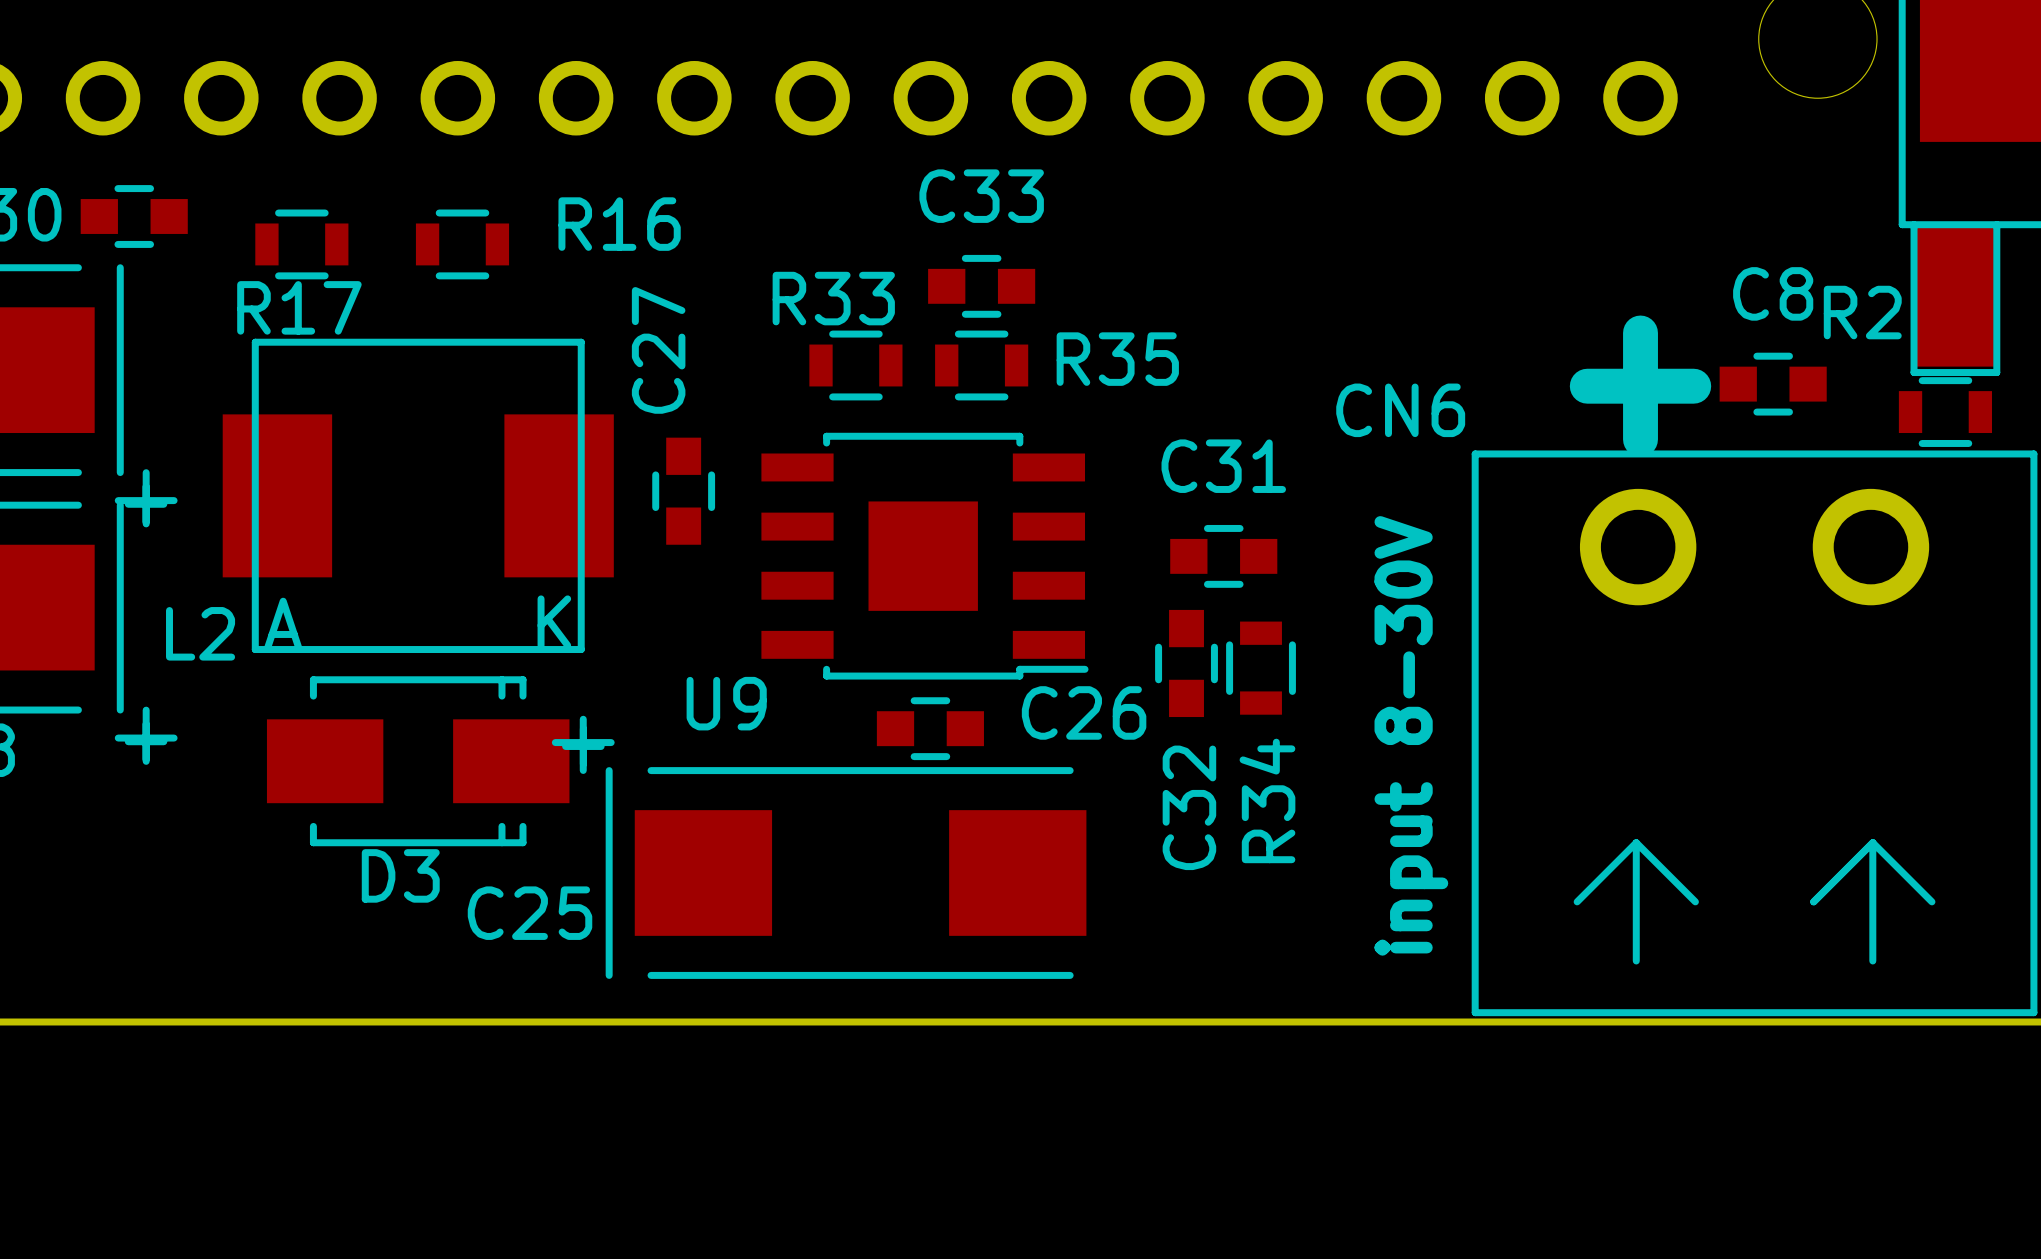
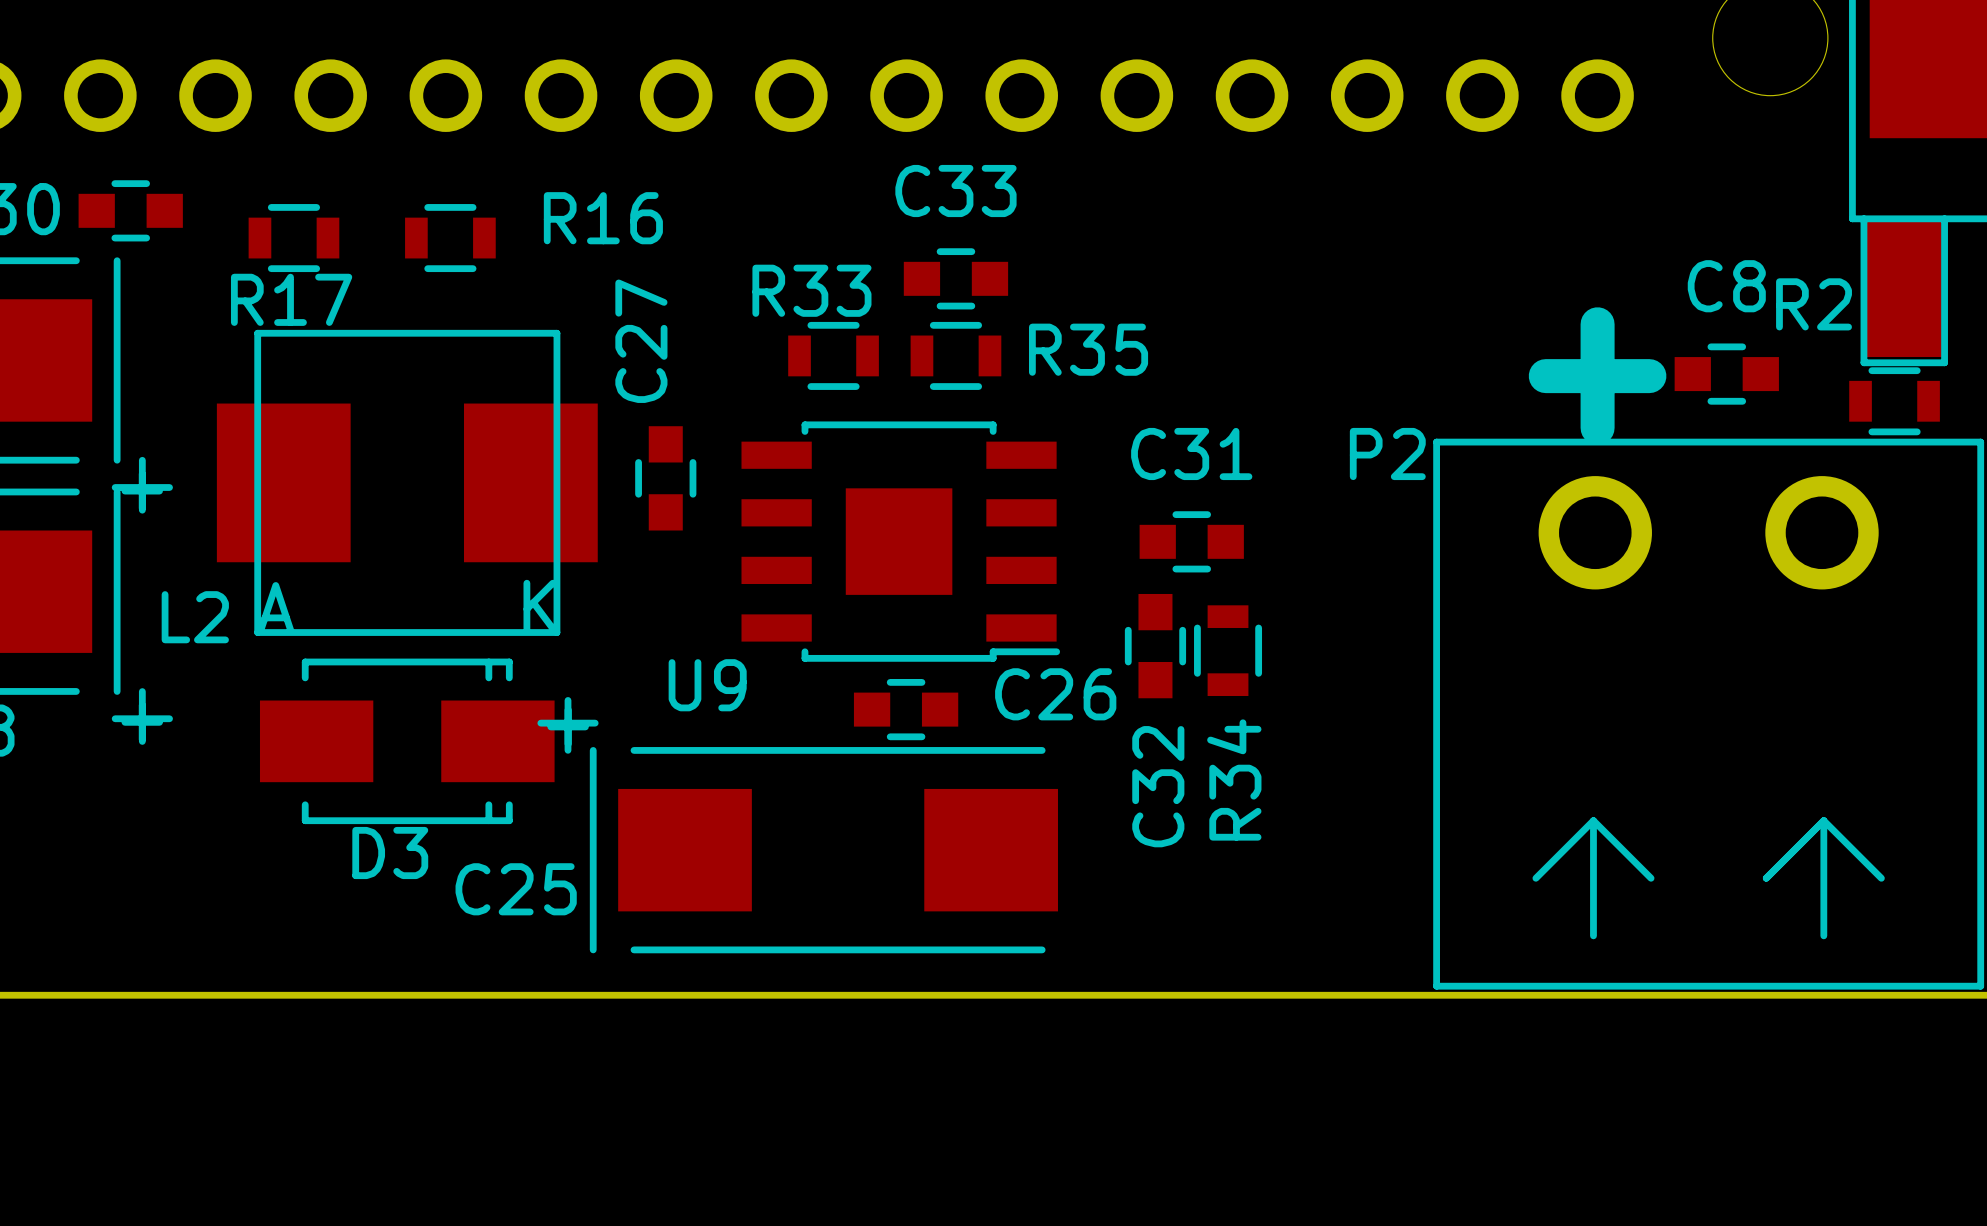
L2 footprint: [222, 338, 614, 654] -> [216, 329, 598, 636]
CN6 name: CN6 (1400, 410) -> P2 (1387, 453)
text: input 8-30V (1411, 735) -> none

